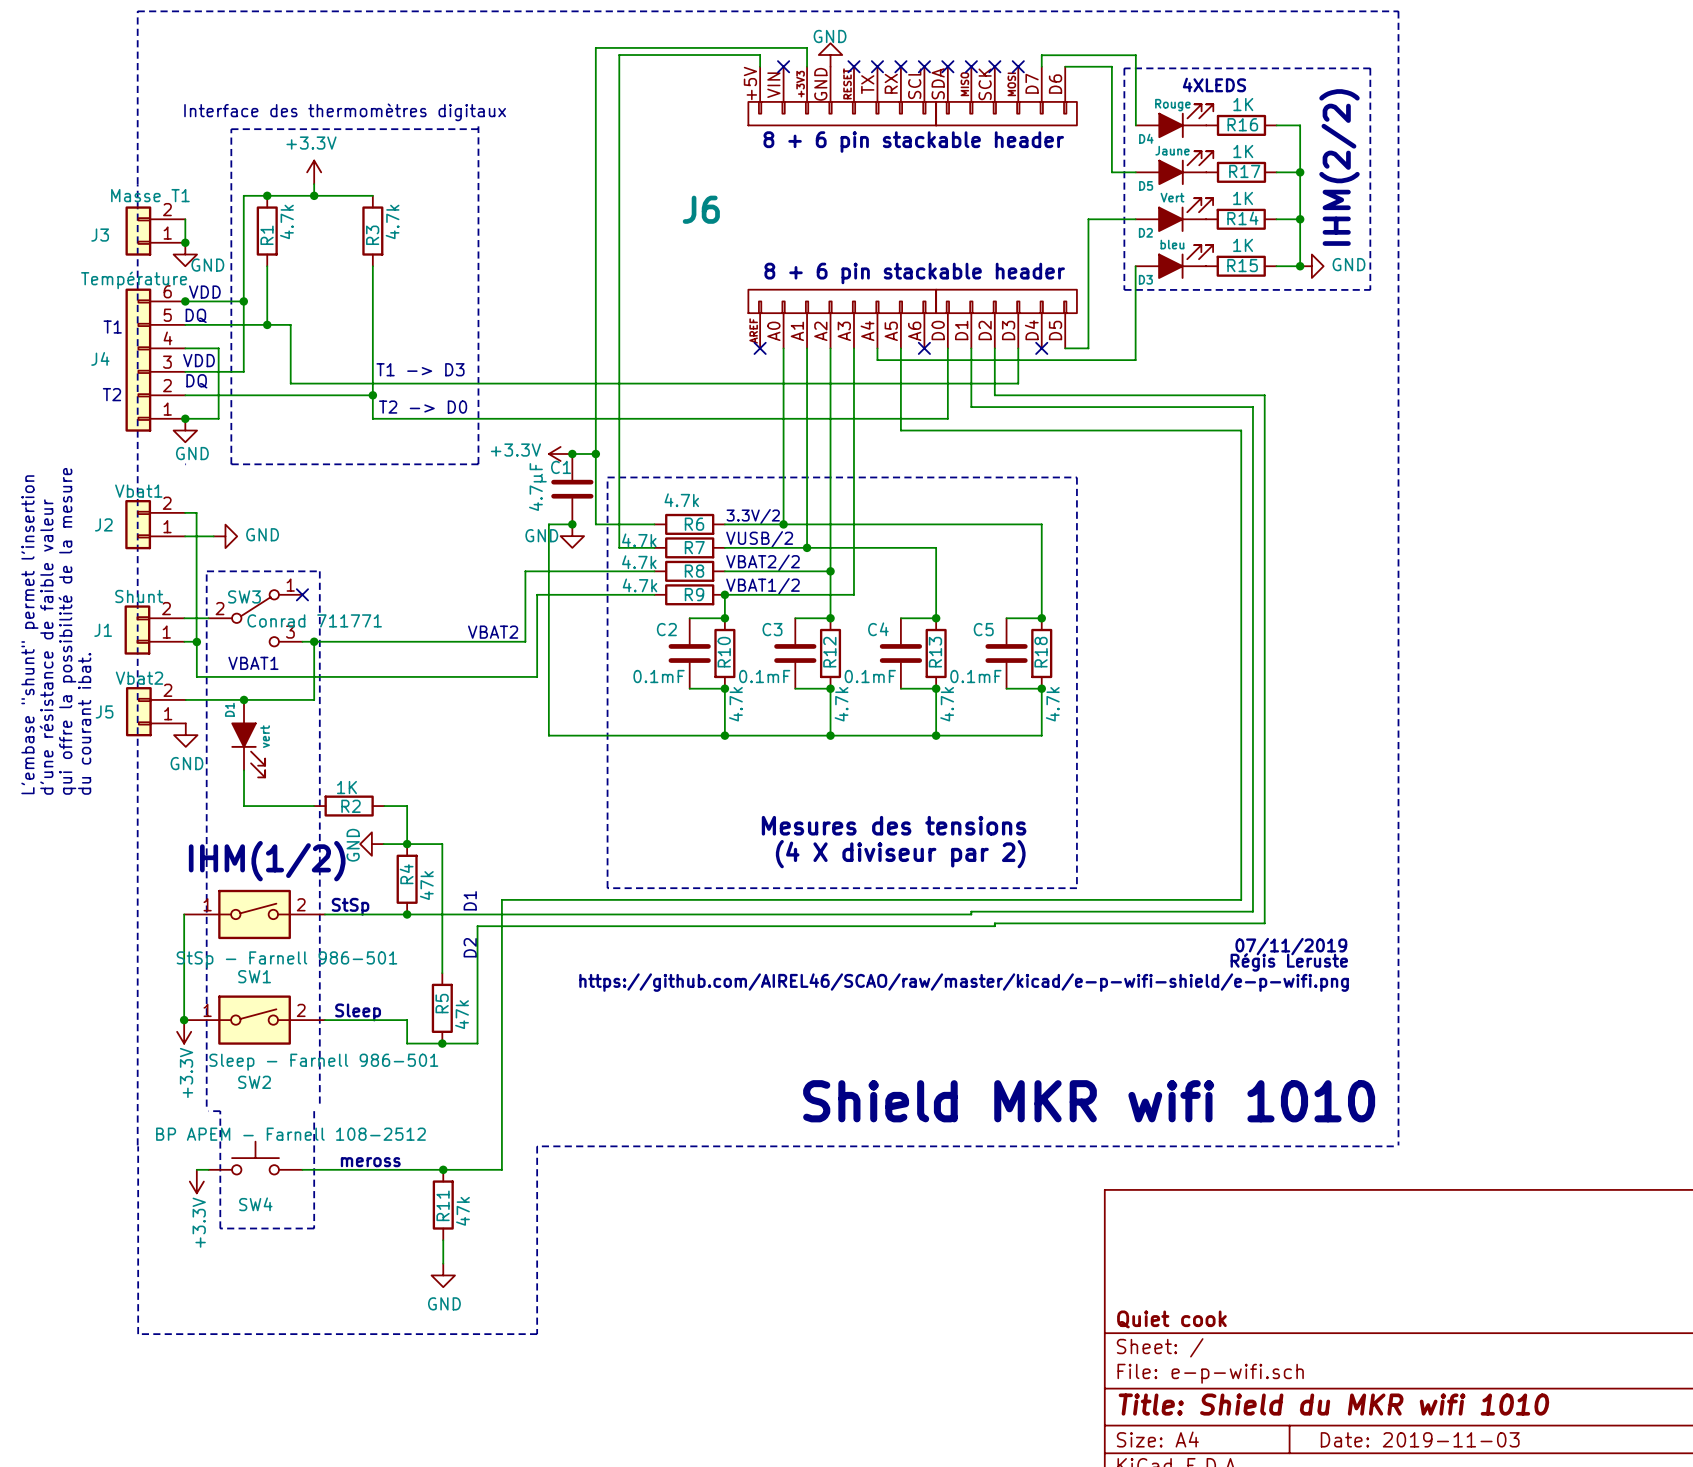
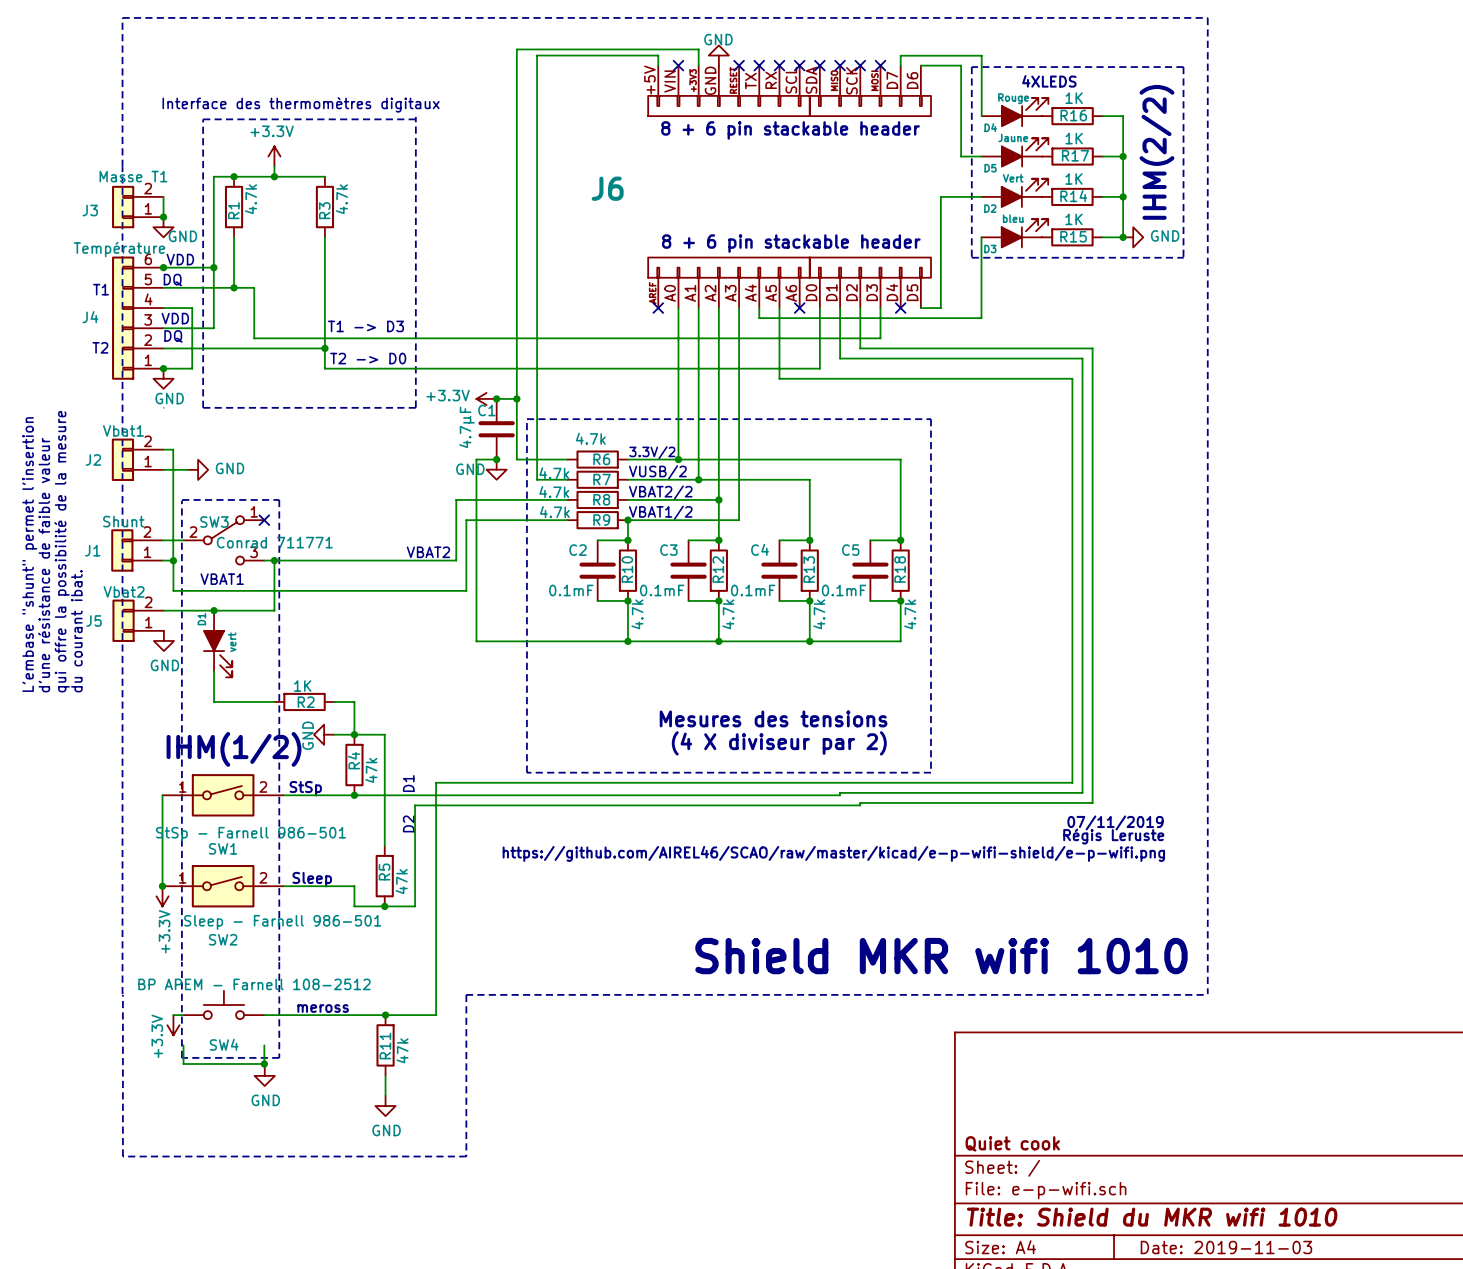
line: none -> (181, 961) (181, 1057) (279, 1057) (279, 962)
line: (208, 1111) (220, 1111) (220, 1228) (314, 1228) (314, 1111) -> none
wire: none -> (183, 1045) (183, 1063) (264, 1063)
wire: none -> (264, 1045) (264, 1065)
power symbol text position: +3.3V (199, 1222) -> +3.3V (157, 1036)
junction: none -> (264, 1063)
power symbol: none -> GND (264, 1075)

